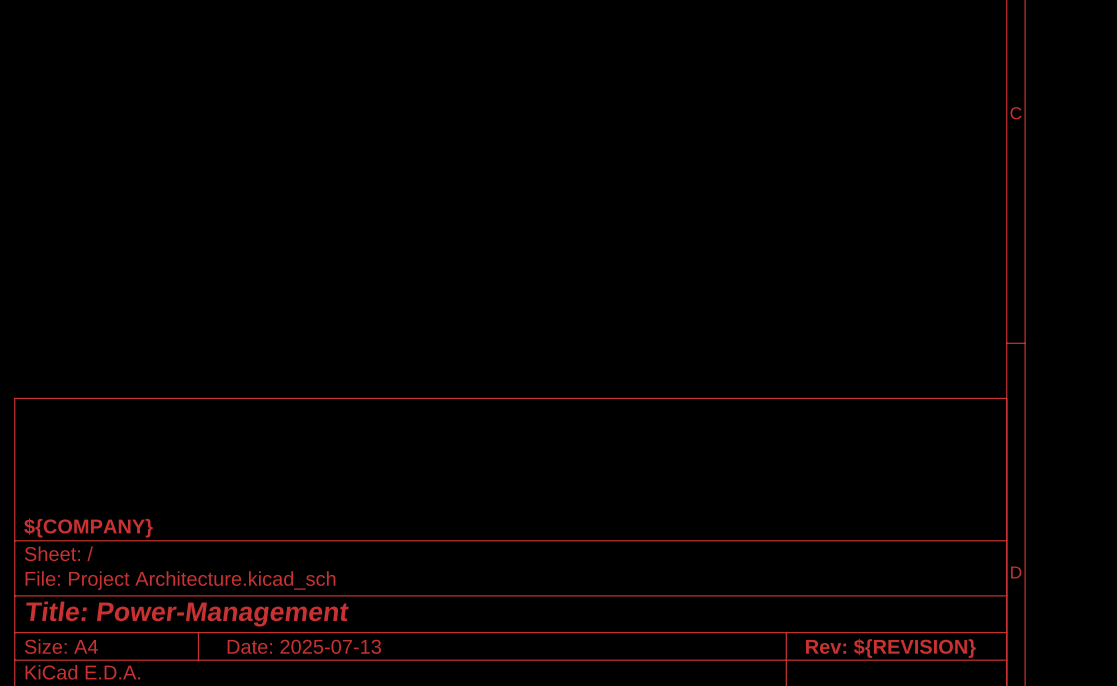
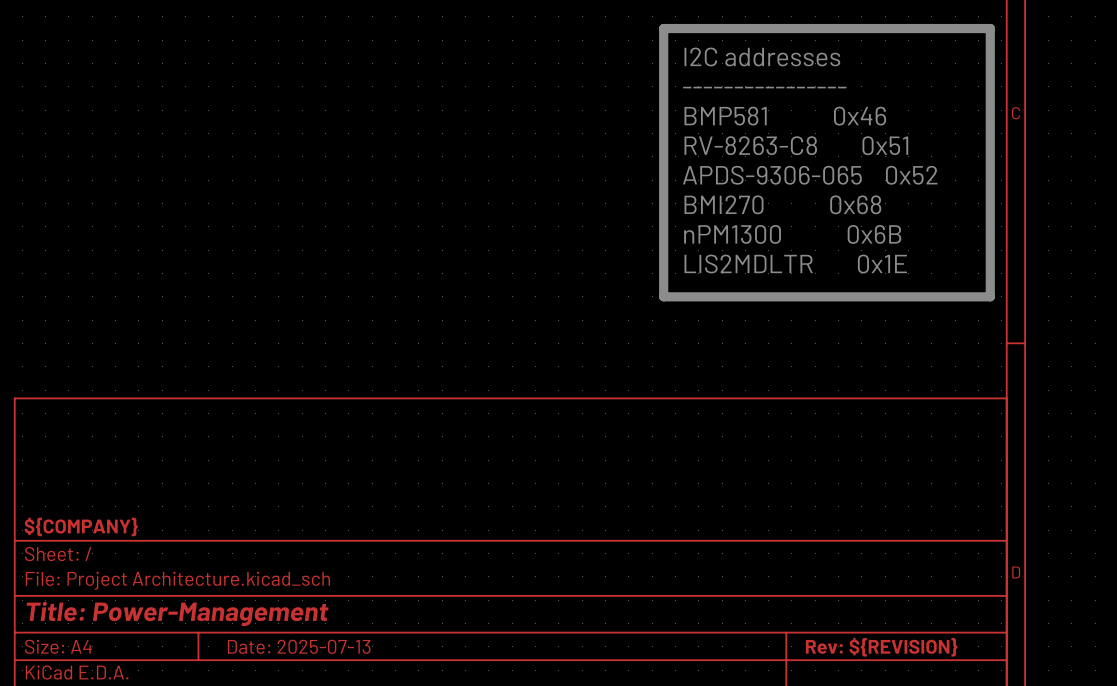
line: none -> (663, 28) (990, 28) (990, 296) (663, 296) (663, 28)
text: none -> I2C addresses (762, 56)
text: none -> ---------------- (764, 87)
text: none -> BMP581 0x46 (785, 116)
text: none -> RV-8263-C8 0x51 (796, 145)
text: none -> APDS-9306-065 0x52 (810, 175)
text: none -> BMI270 0x68 (782, 204)
text: none -> nPM1300 0x6B (792, 234)
text: none -> LIS2MDLTR 0x1E (795, 264)

